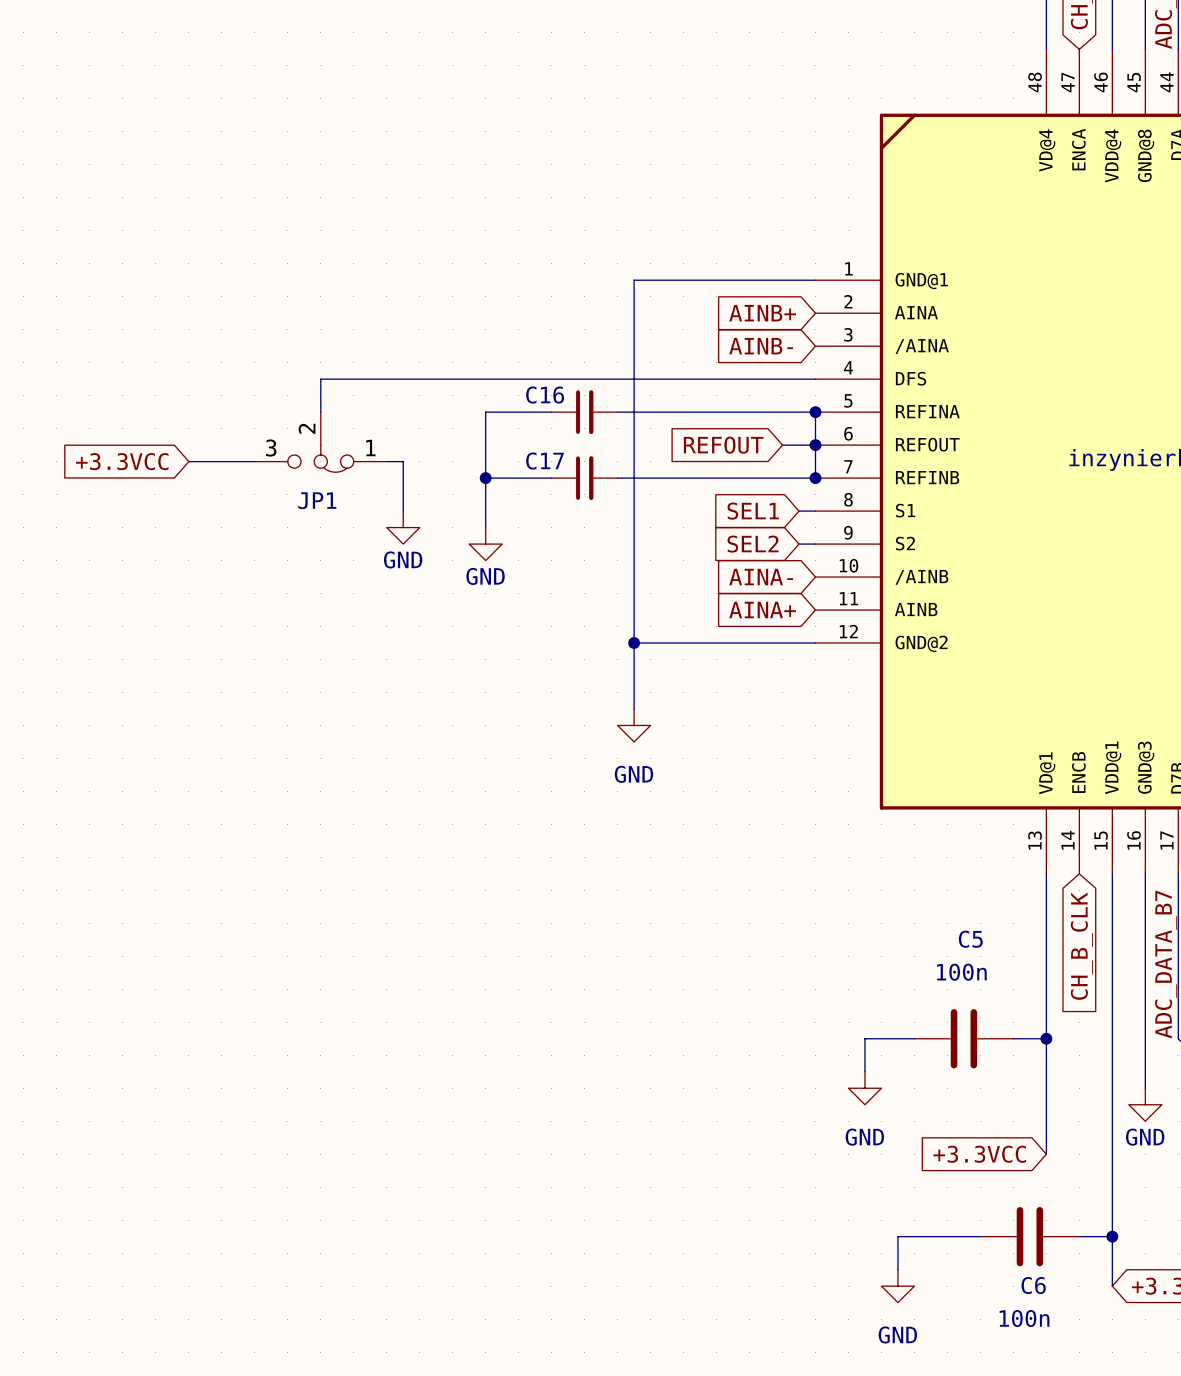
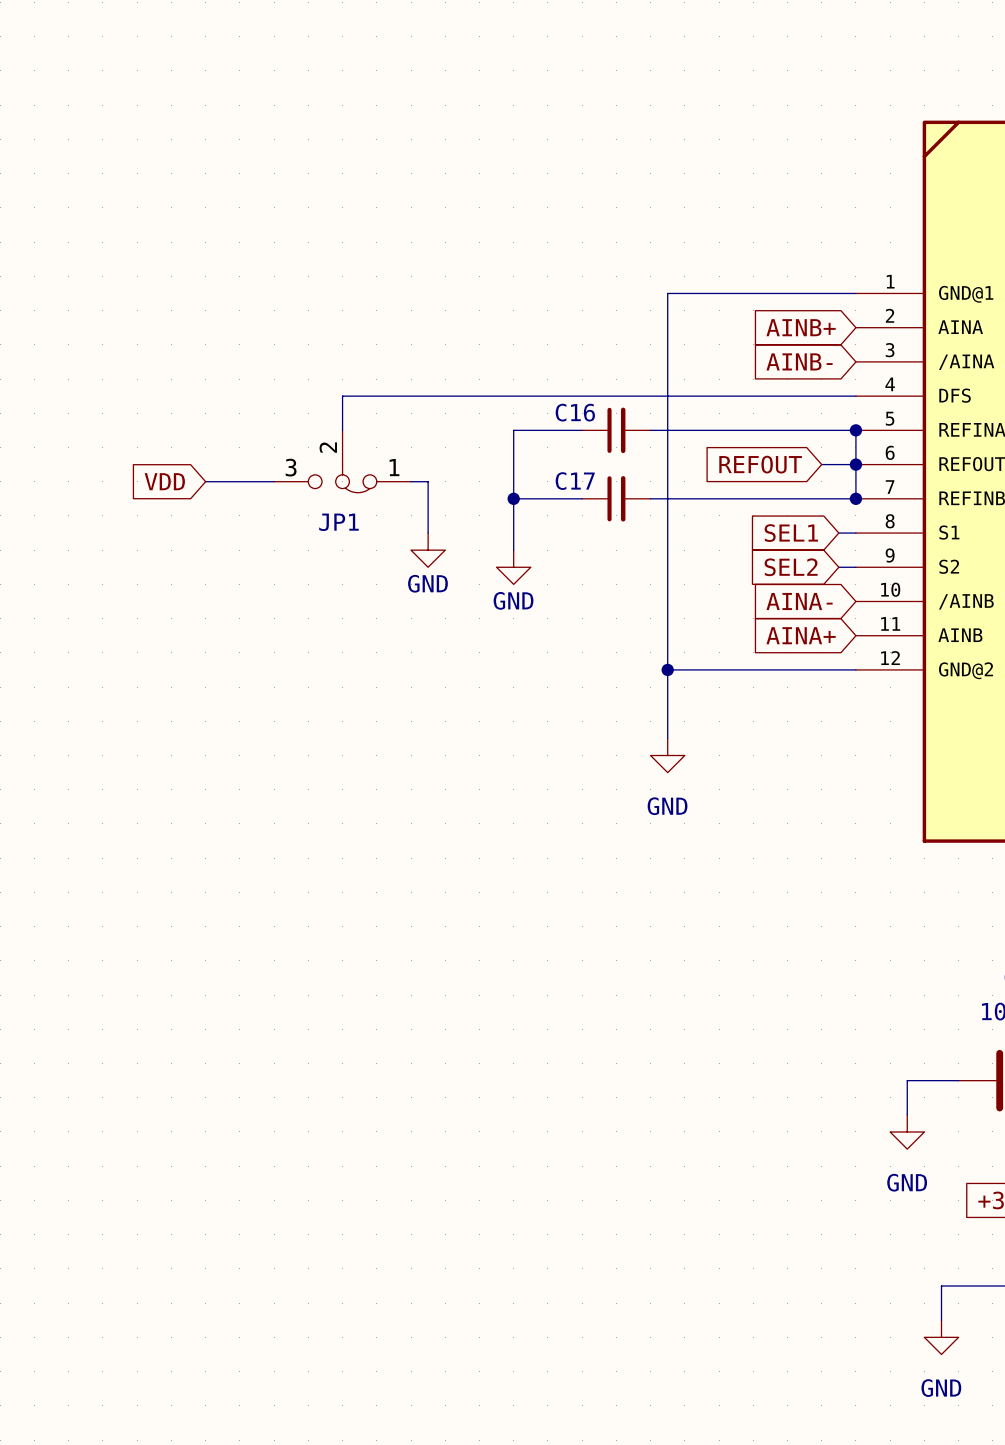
global label: +3.3VCC (122, 461) -> VDD (164, 481)

